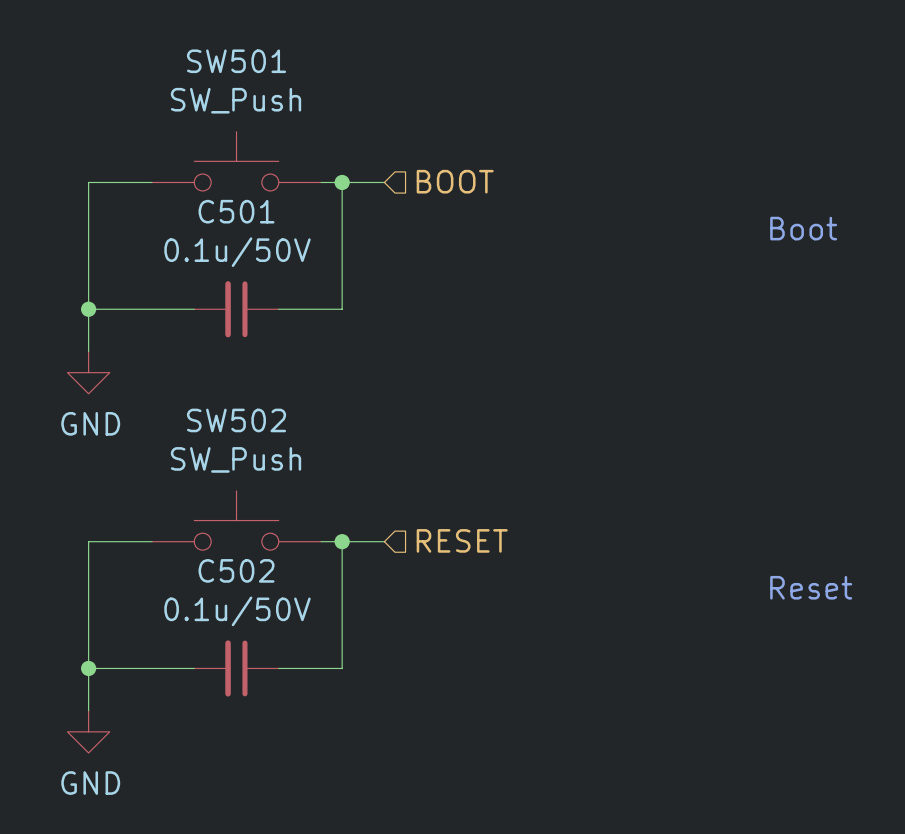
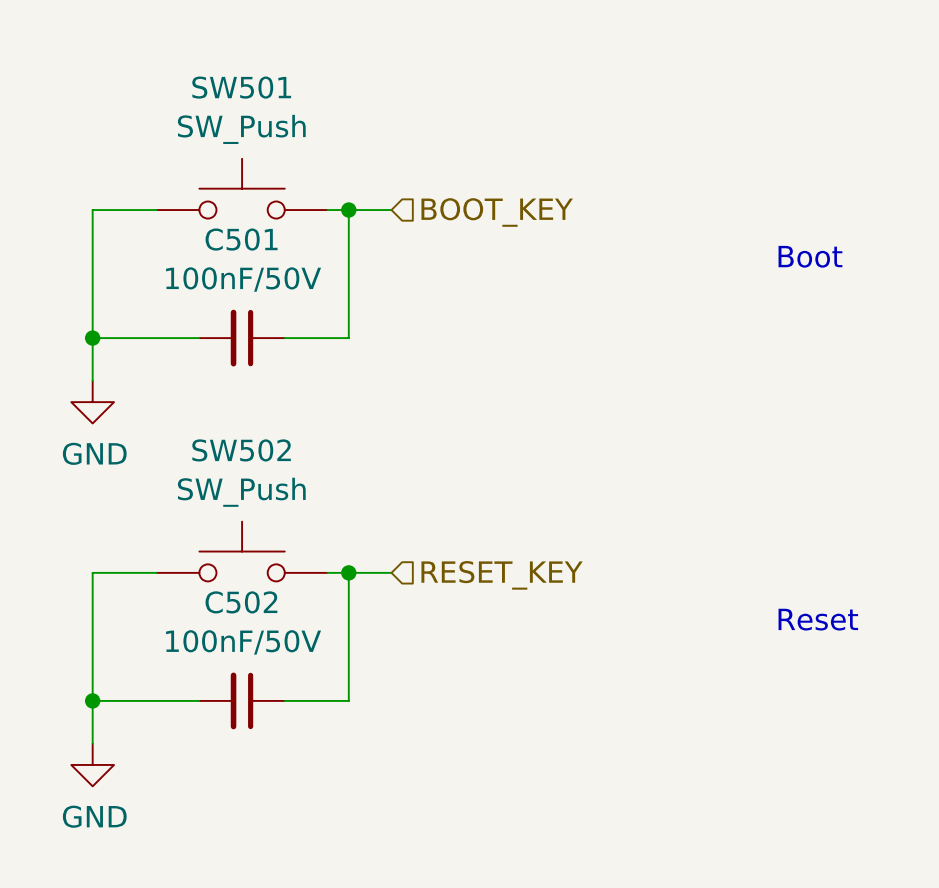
hierarchical label: BOOT (455, 181) -> BOOT_KEY (497, 212)
C501 value: 0.1u/50V (237, 252) -> 100nF/50V (243, 279)
hierarchical label: RESET (462, 540) -> RESET_KEY (502, 575)
C502 value: 0.1u/50V (237, 611) -> 100nF/50V (243, 642)

